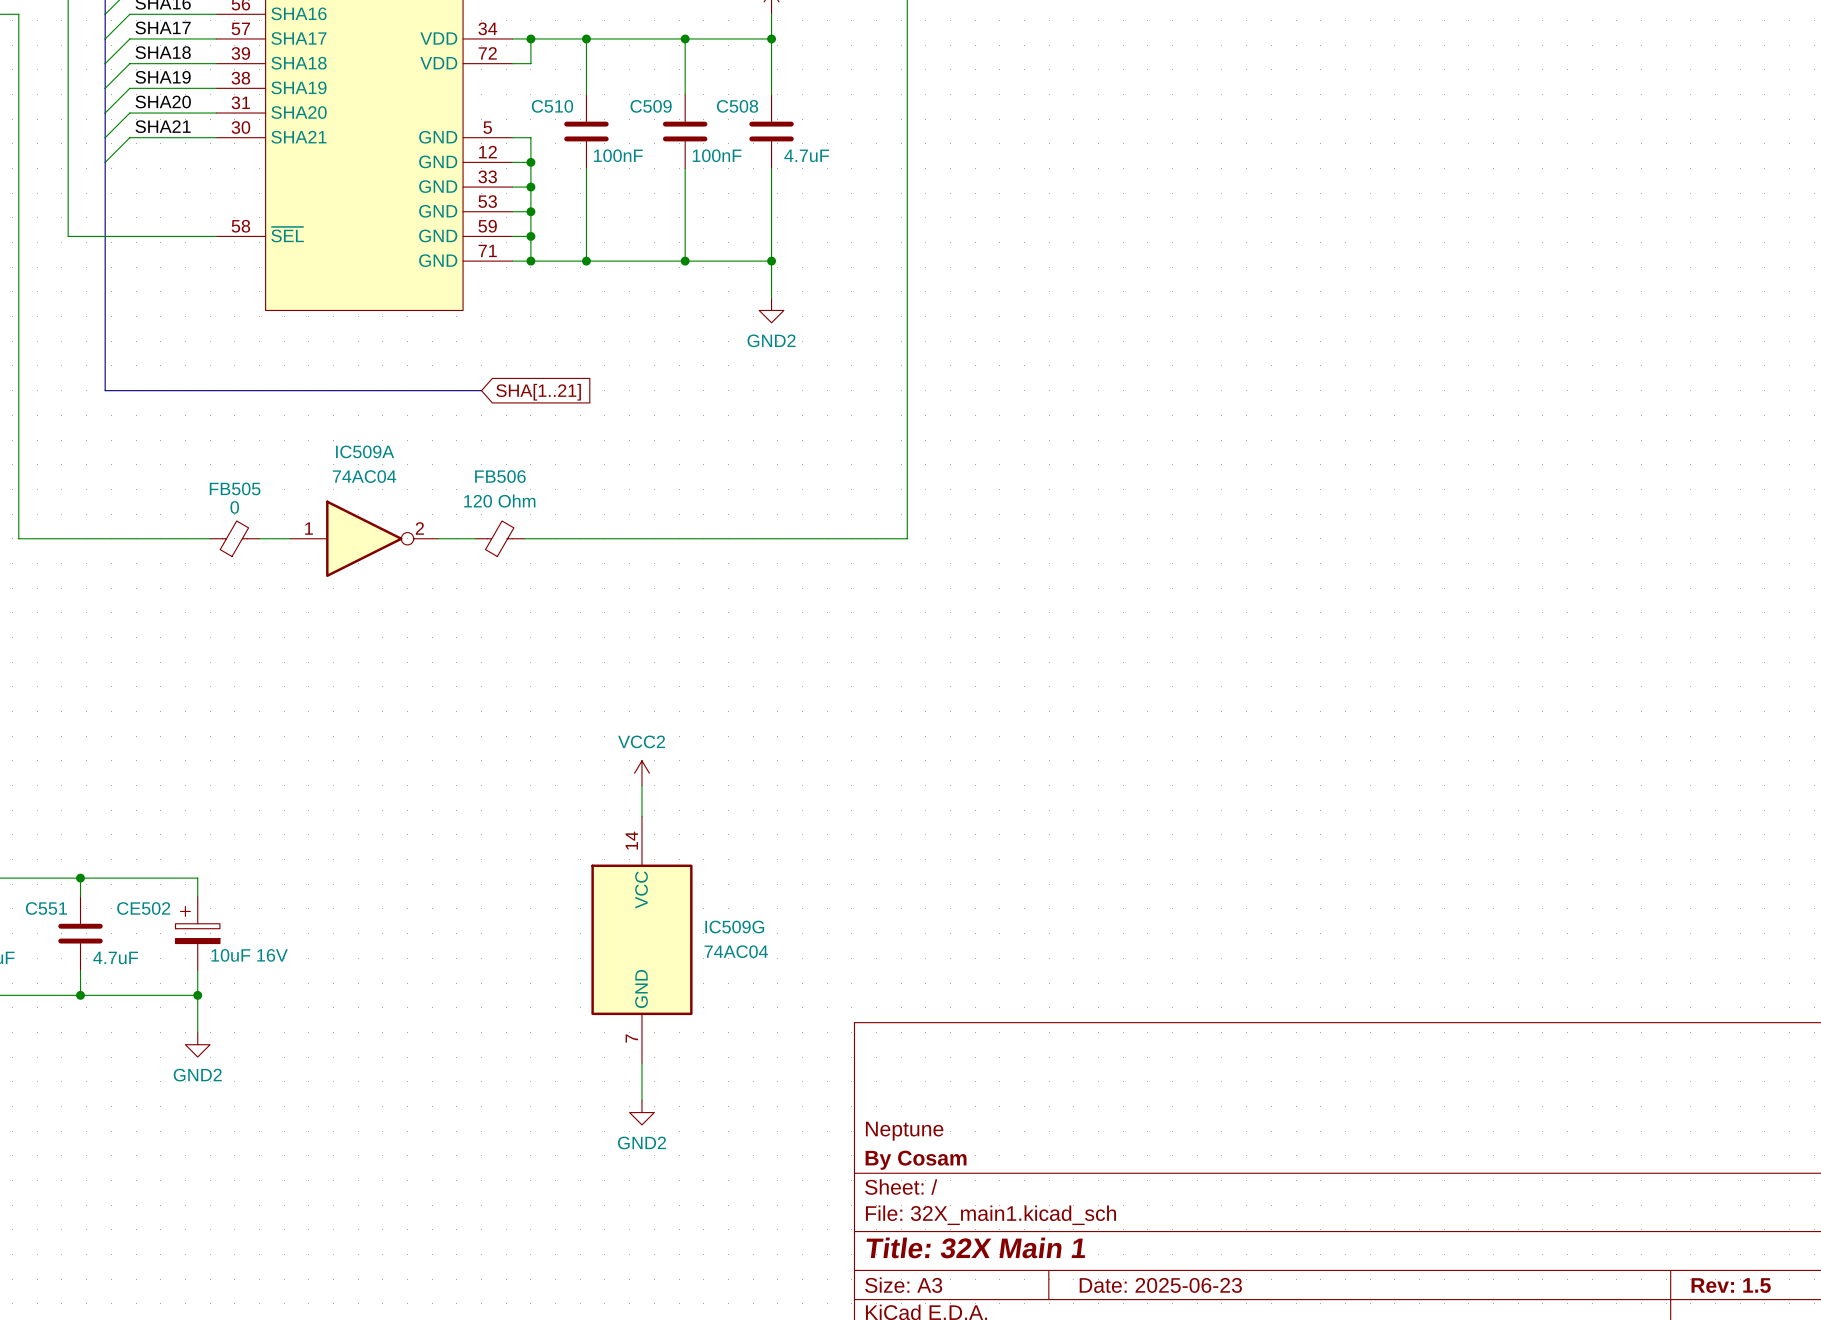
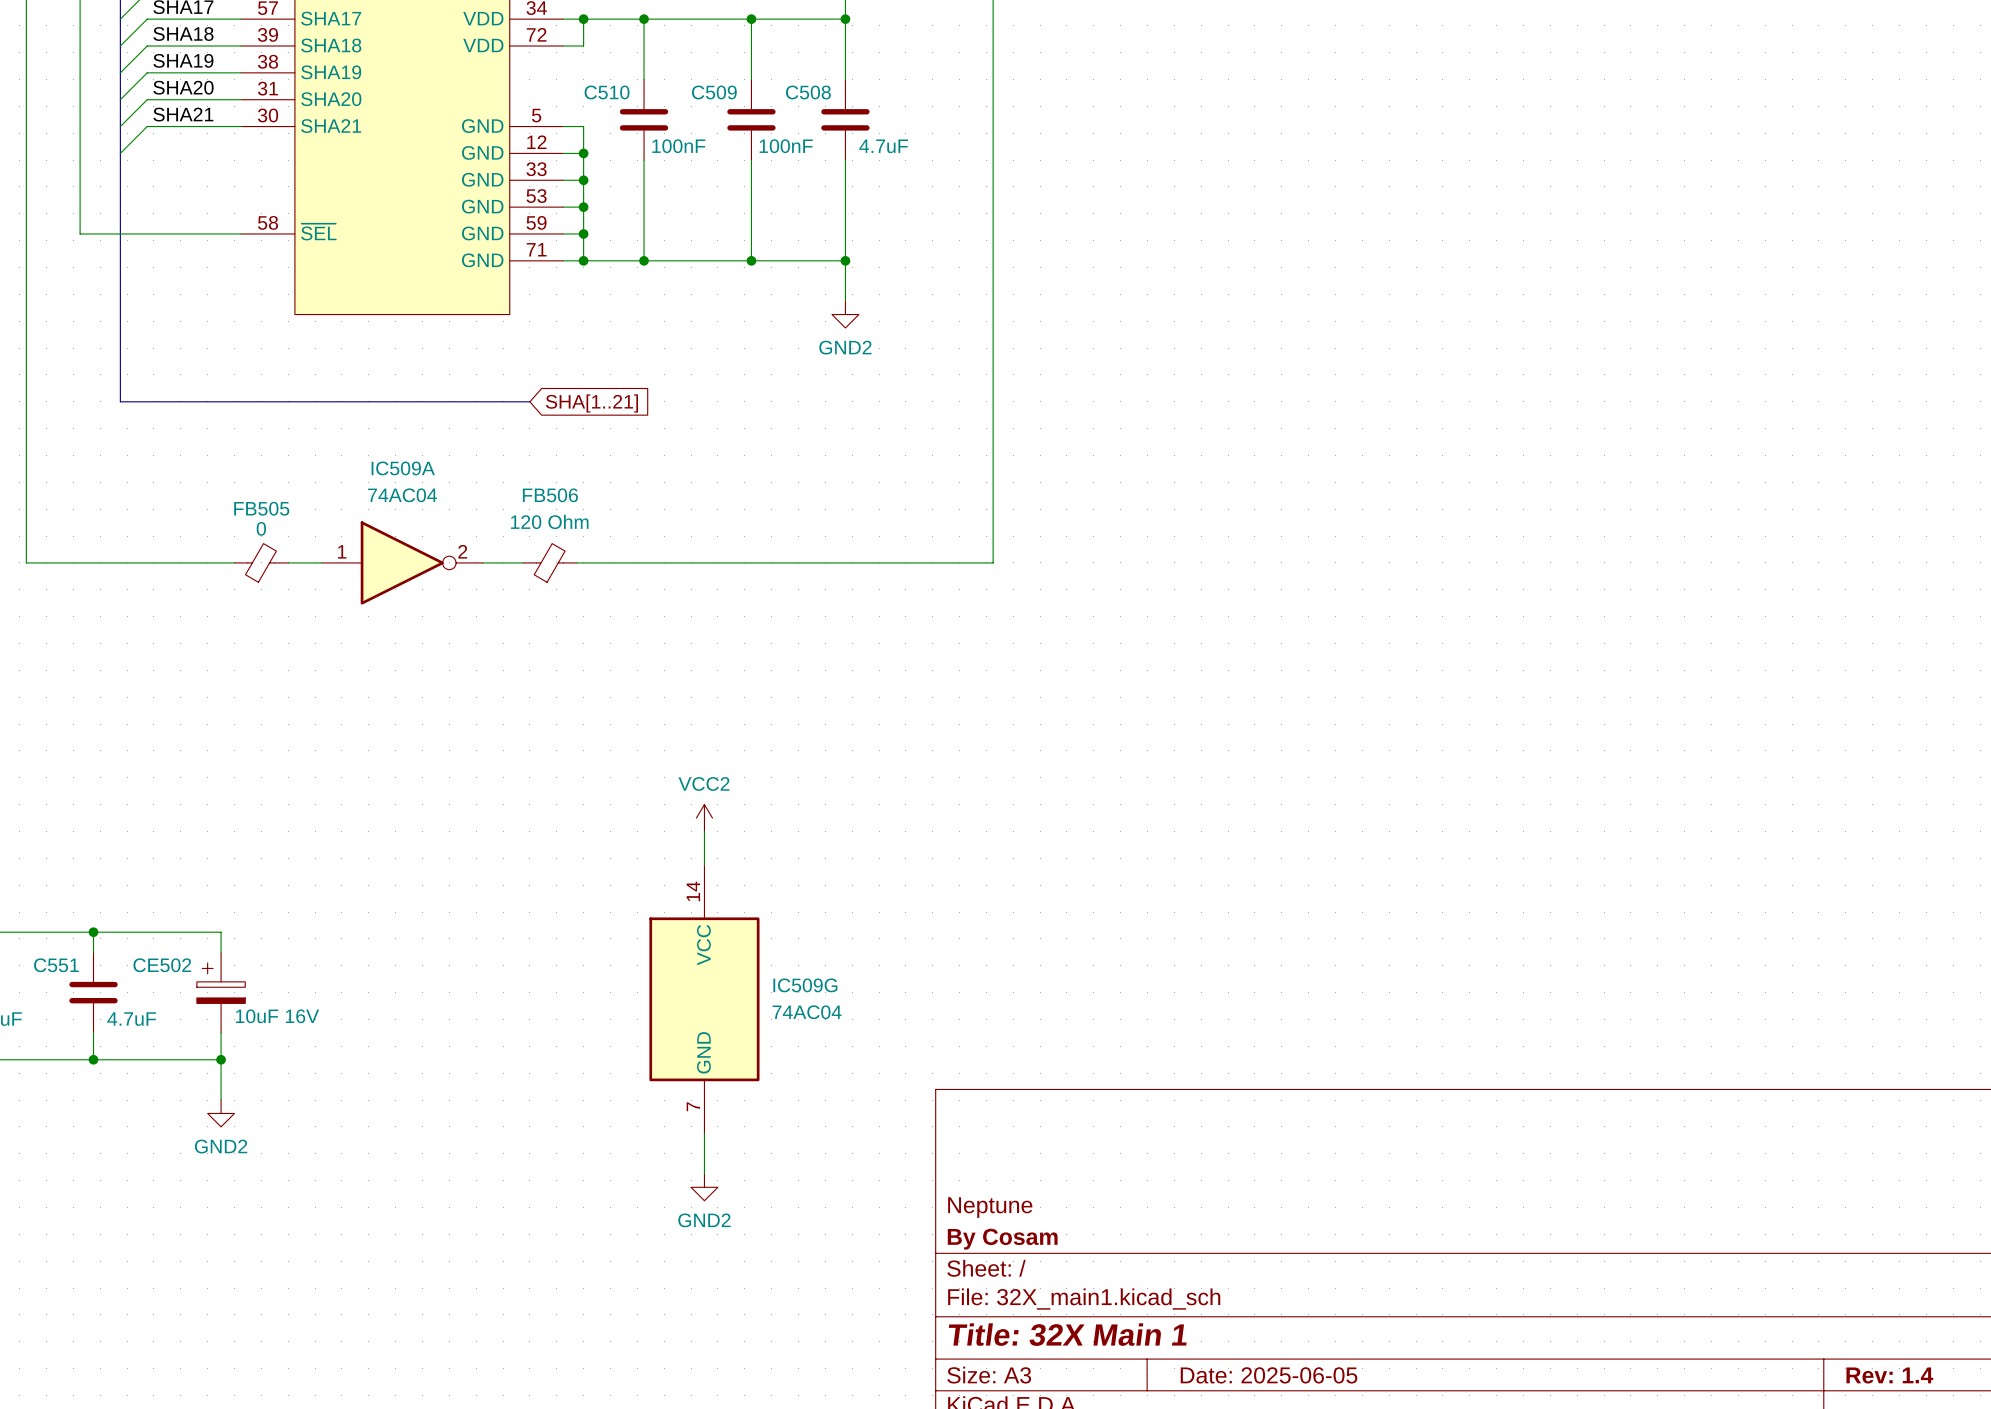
title block: Date: 2025-06-23 (1160, 1285) -> Date: 2025-06-05 (1269, 1375)
title block: Rev: 1.5 (1731, 1285) -> Rev: 1.4 (1889, 1375)

